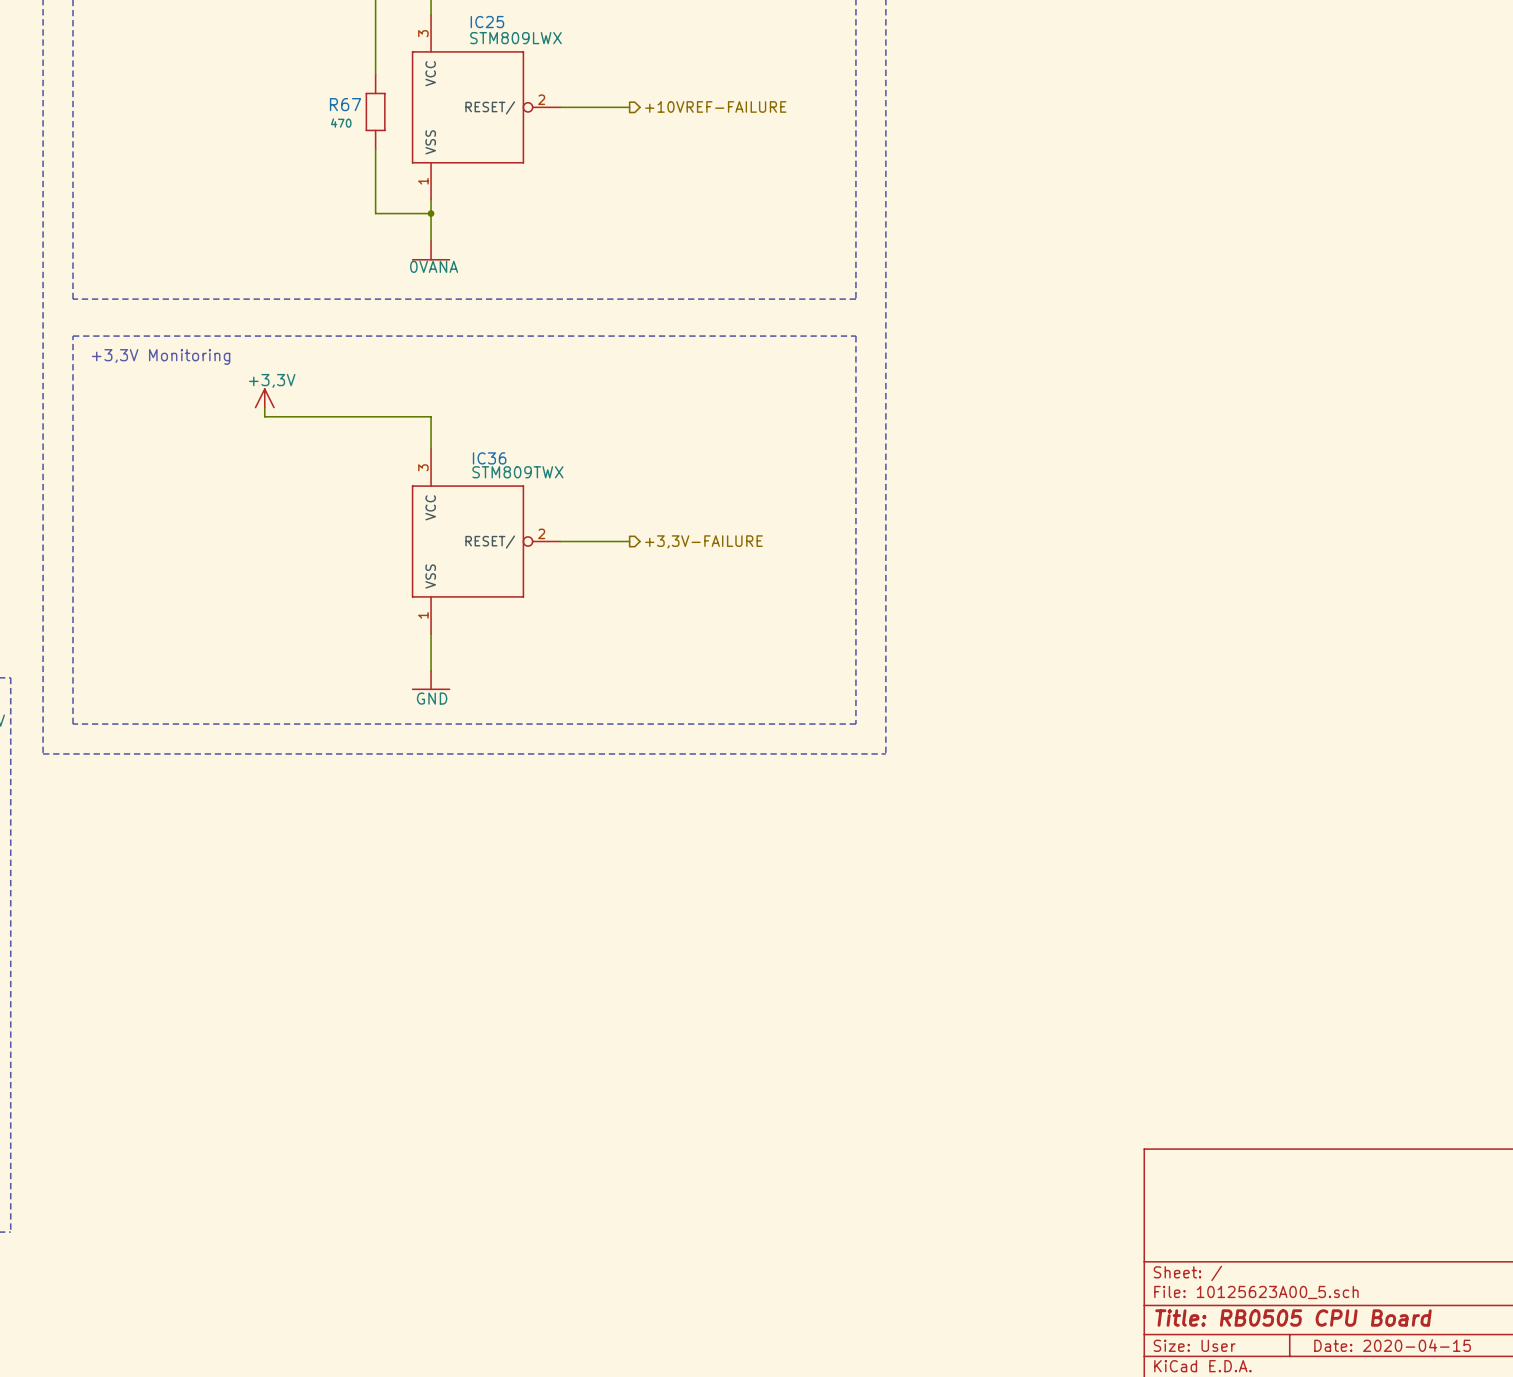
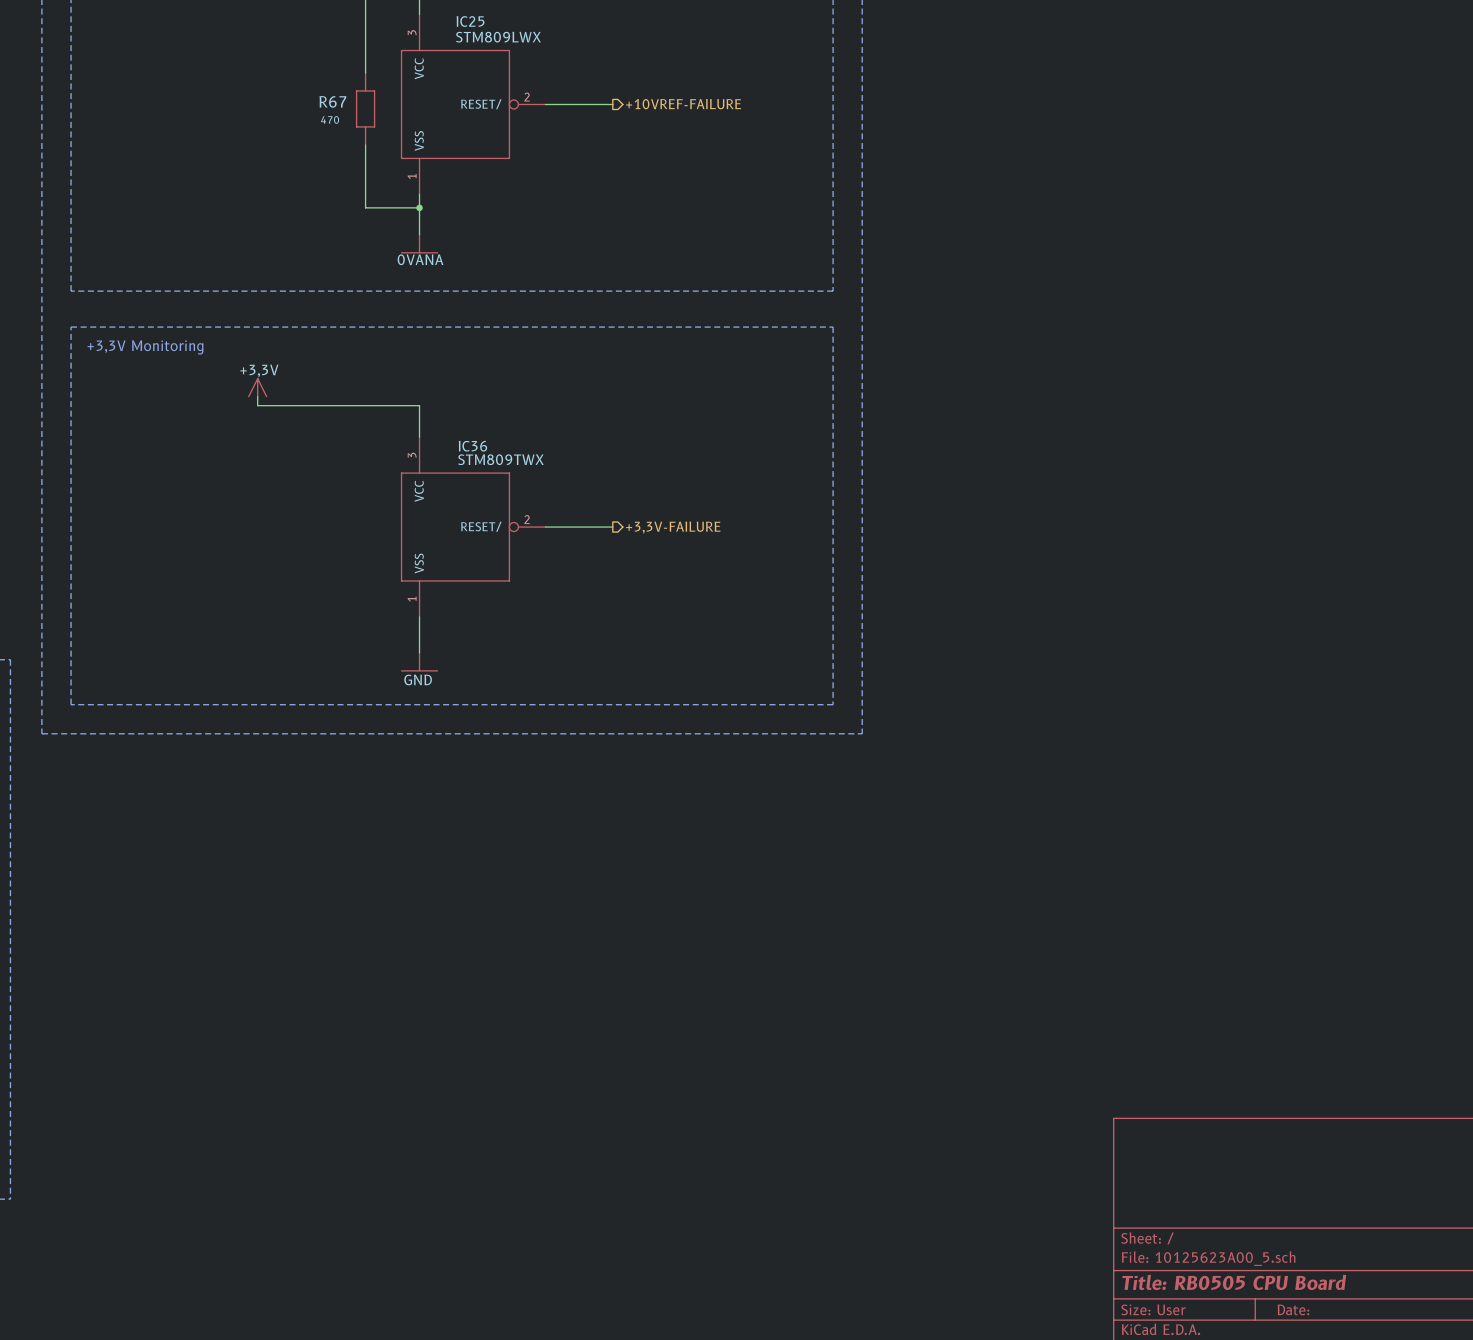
title block: Date: 2020-04-15 (1392, 1345) -> Date: (1293, 1309)

